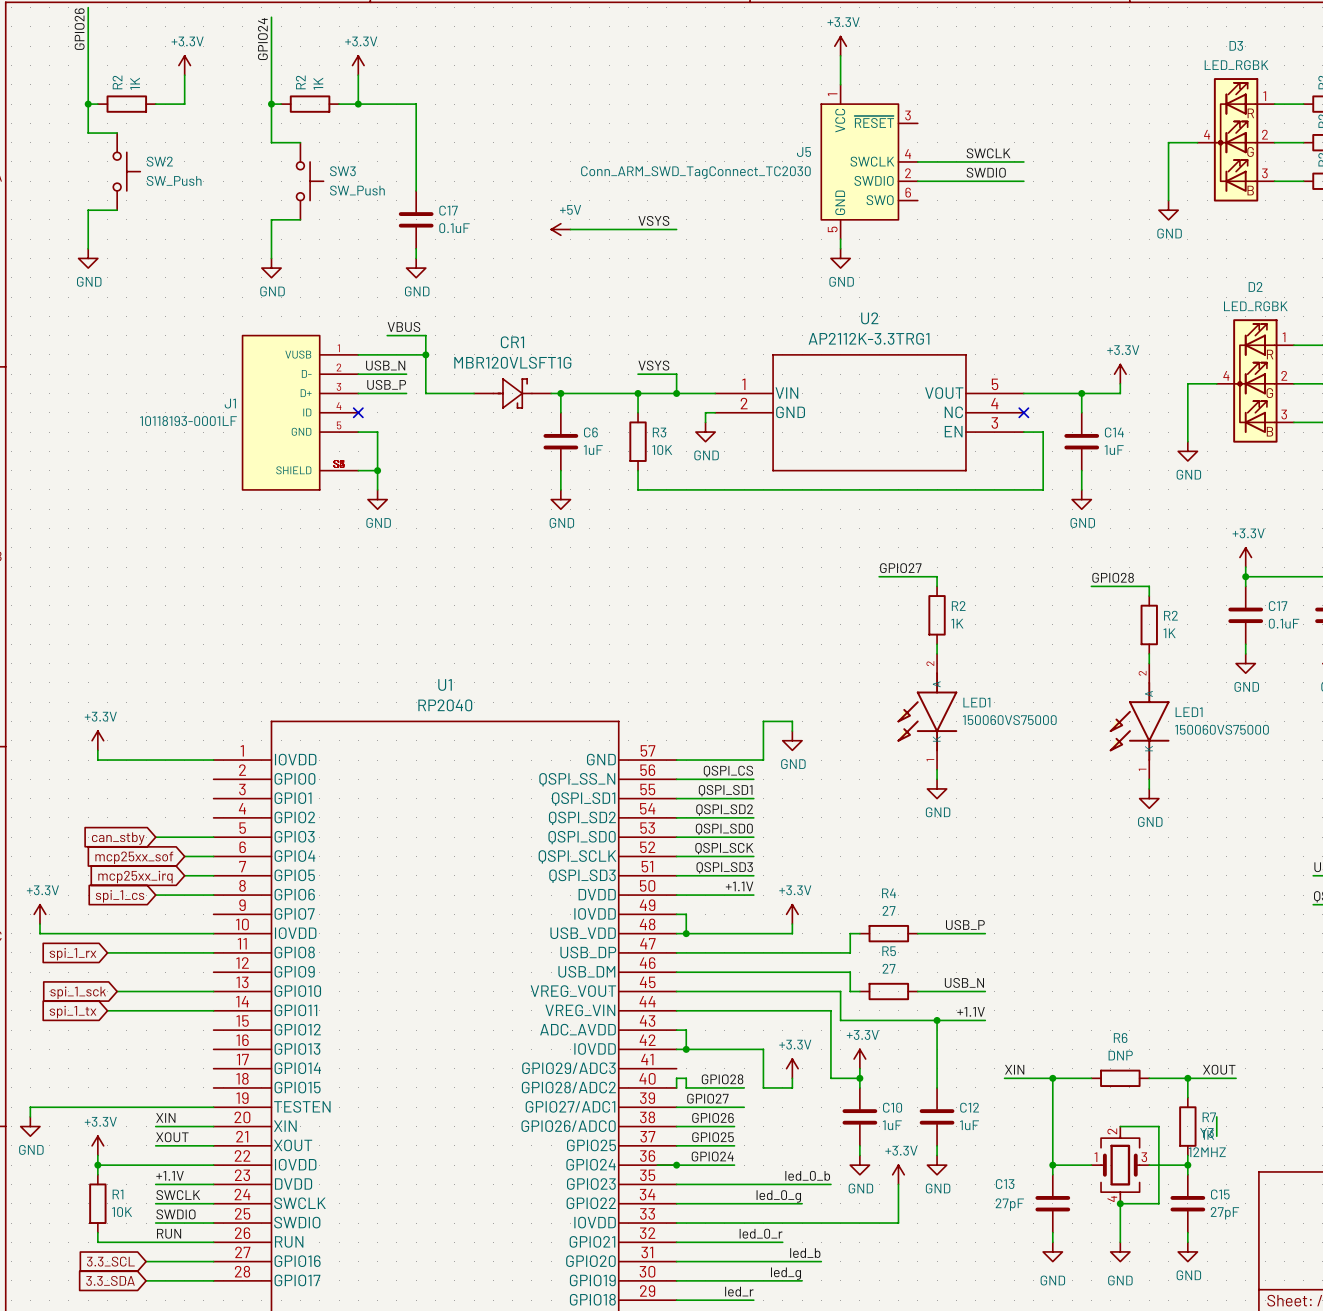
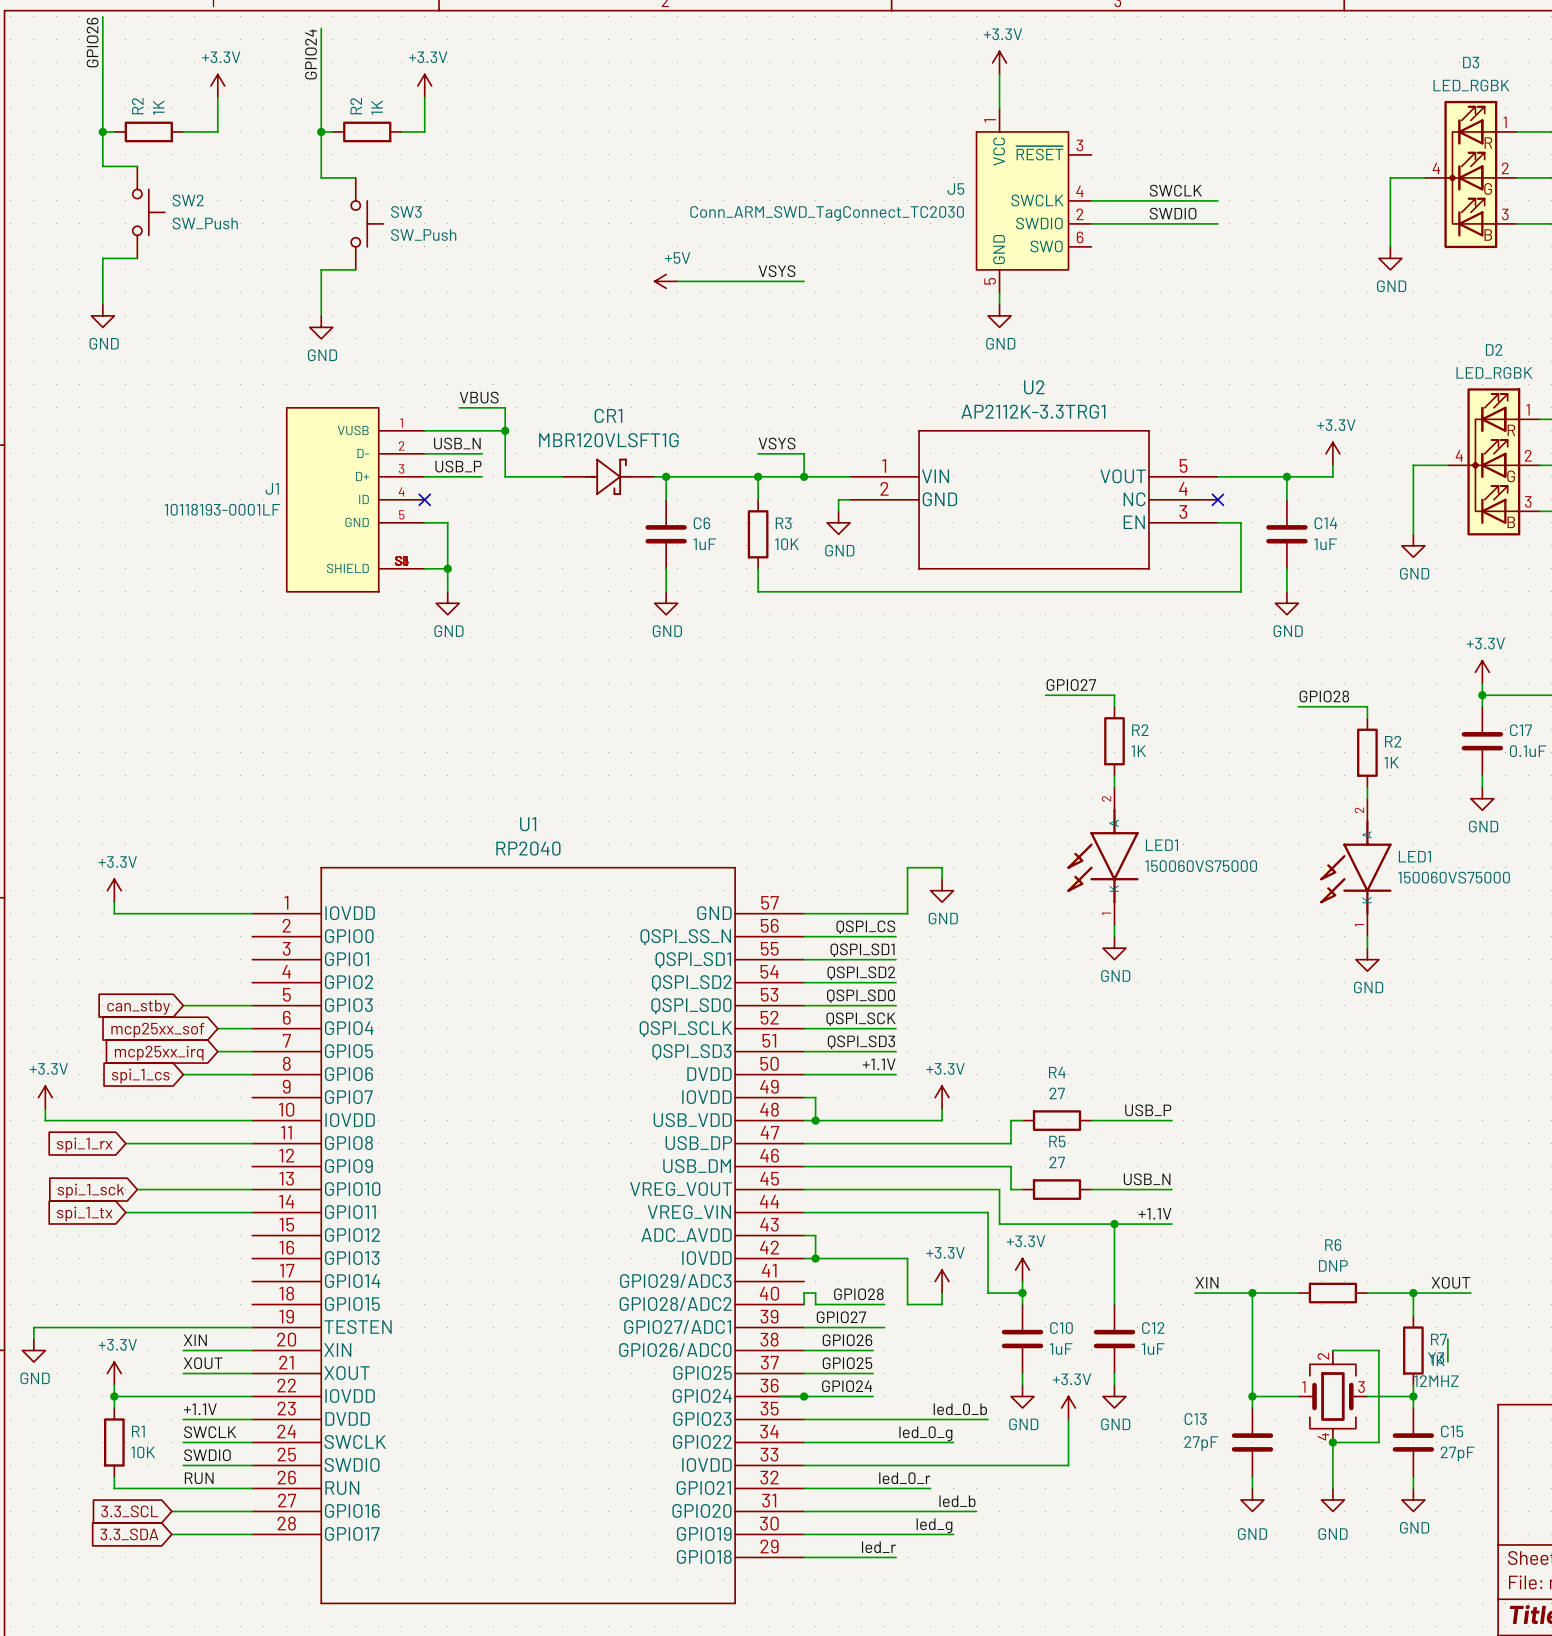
wire: (358, 104) (416, 104) (416, 190) -> none
junction: (358, 104) -> none
C17: 0.1uF (416, 219) -> none
wire: (416, 248) (416, 258) -> none
power symbol: GND (416, 268) -> none

